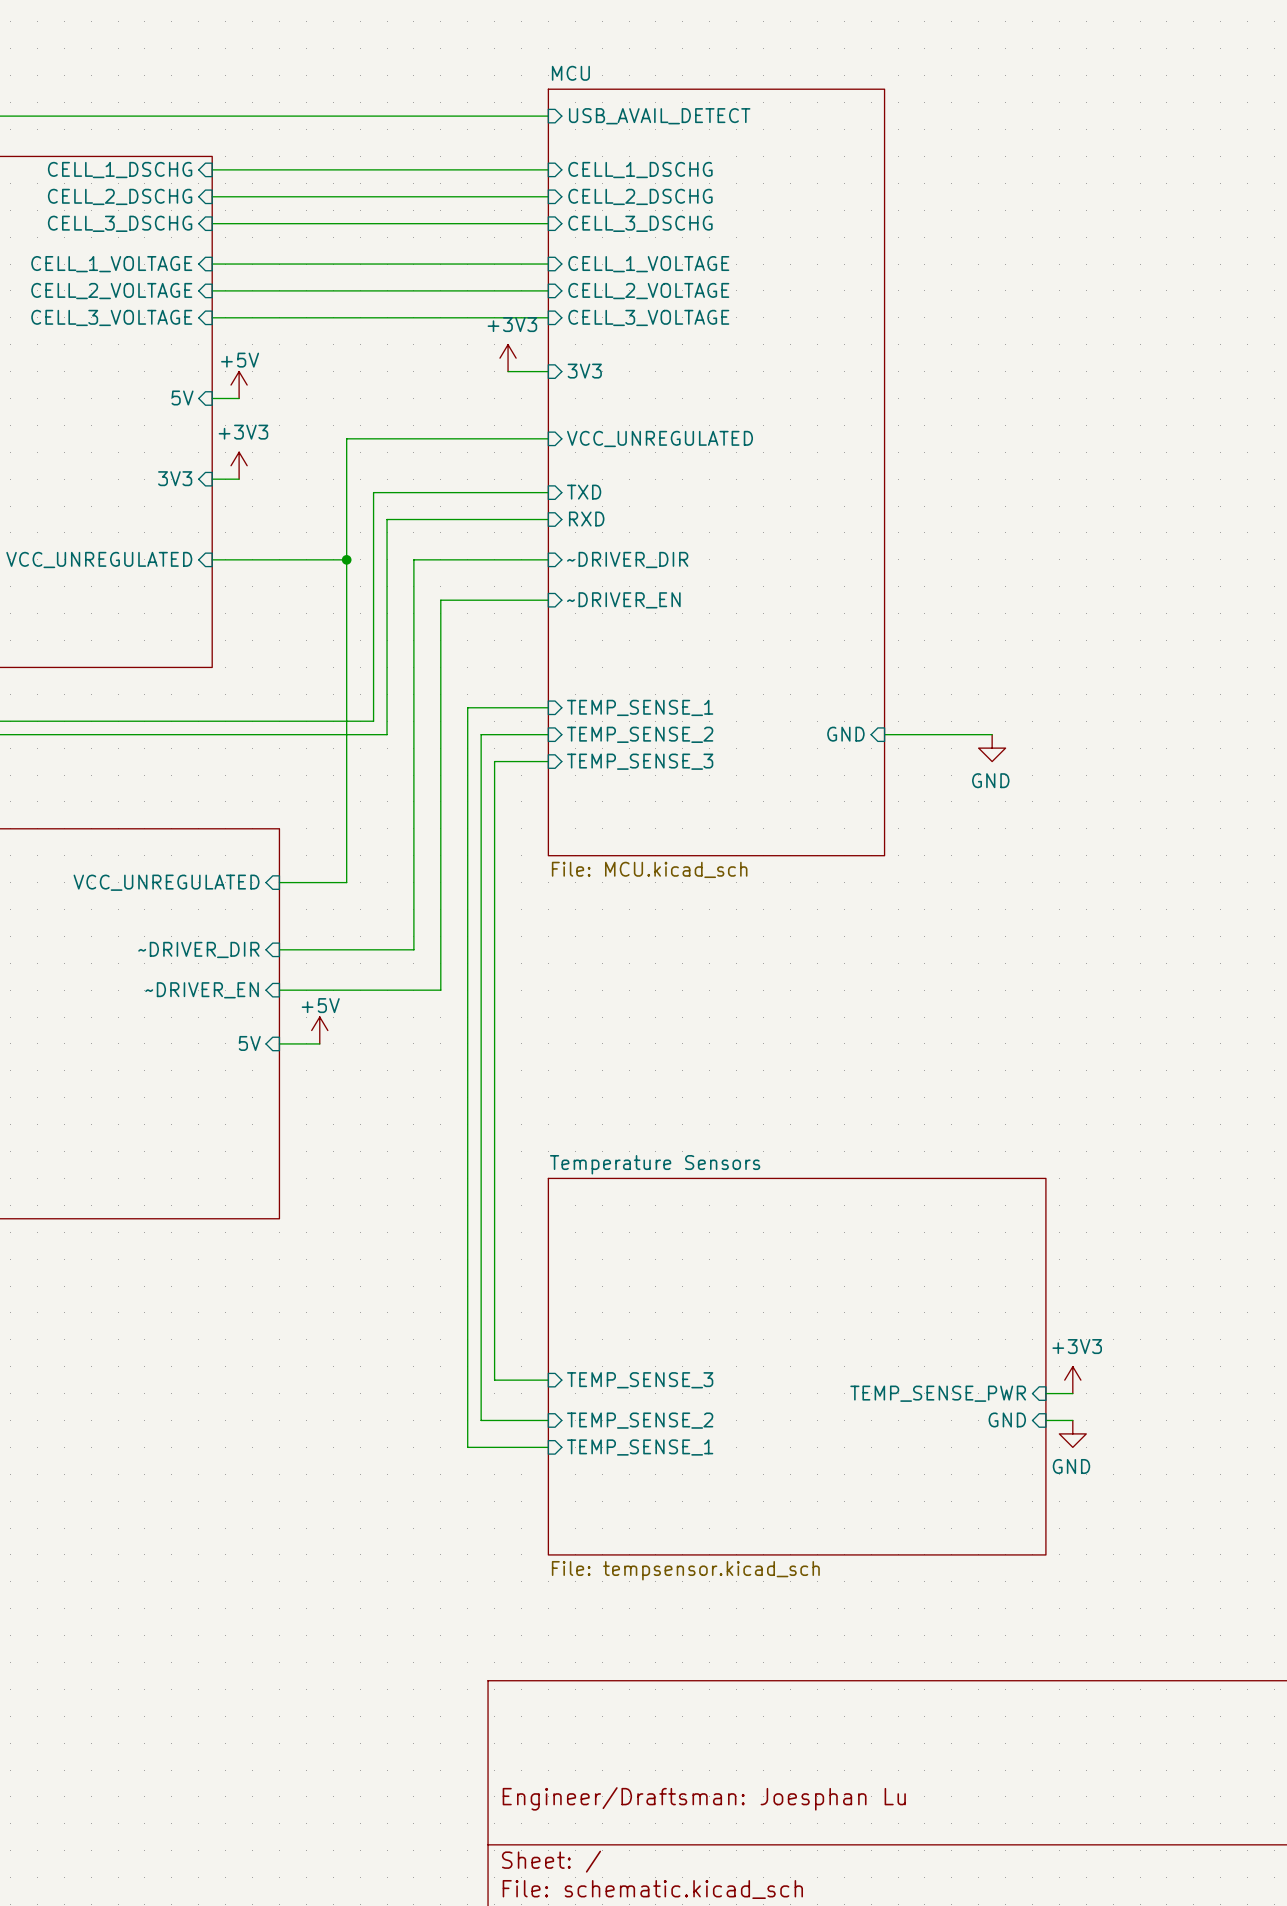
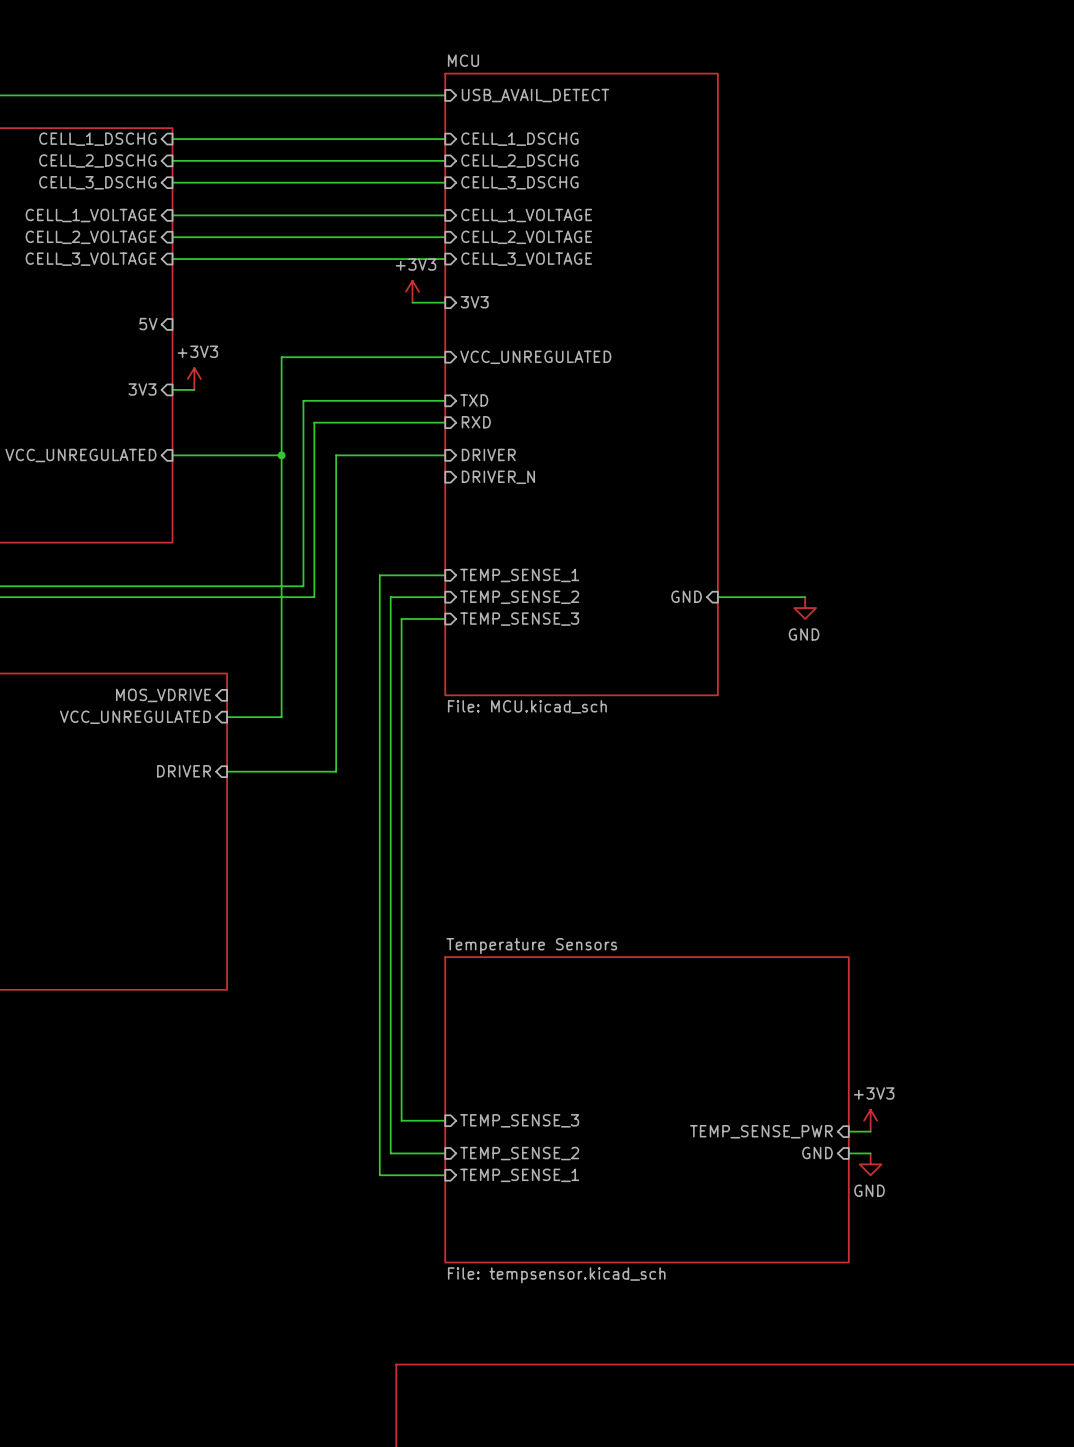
power symbol: +5V (239, 385) -> none
wire: (212, 398) (239, 398) -> none
sheet pin: ~DRIVER_DIR (627, 559) -> DRIVER (488, 454)
wire: (548, 600) (440, 600) (440, 990) (279, 990) -> none
sheet pin: ~DRIVER_EN (623, 600) -> DRIVER_N (498, 477)
sheet pin: none -> MOS_VDRIVE (163, 695)
sheet pin: ~DRIVER_DIR (198, 949) -> DRIVER (184, 771)
sheet pin: ~DRIVER_EN (202, 990) -> none
power symbol: +5V (319, 1030) -> none
sheet pin: 5V (249, 1043) -> none
wire: (279, 1043) (319, 1043) -> none

